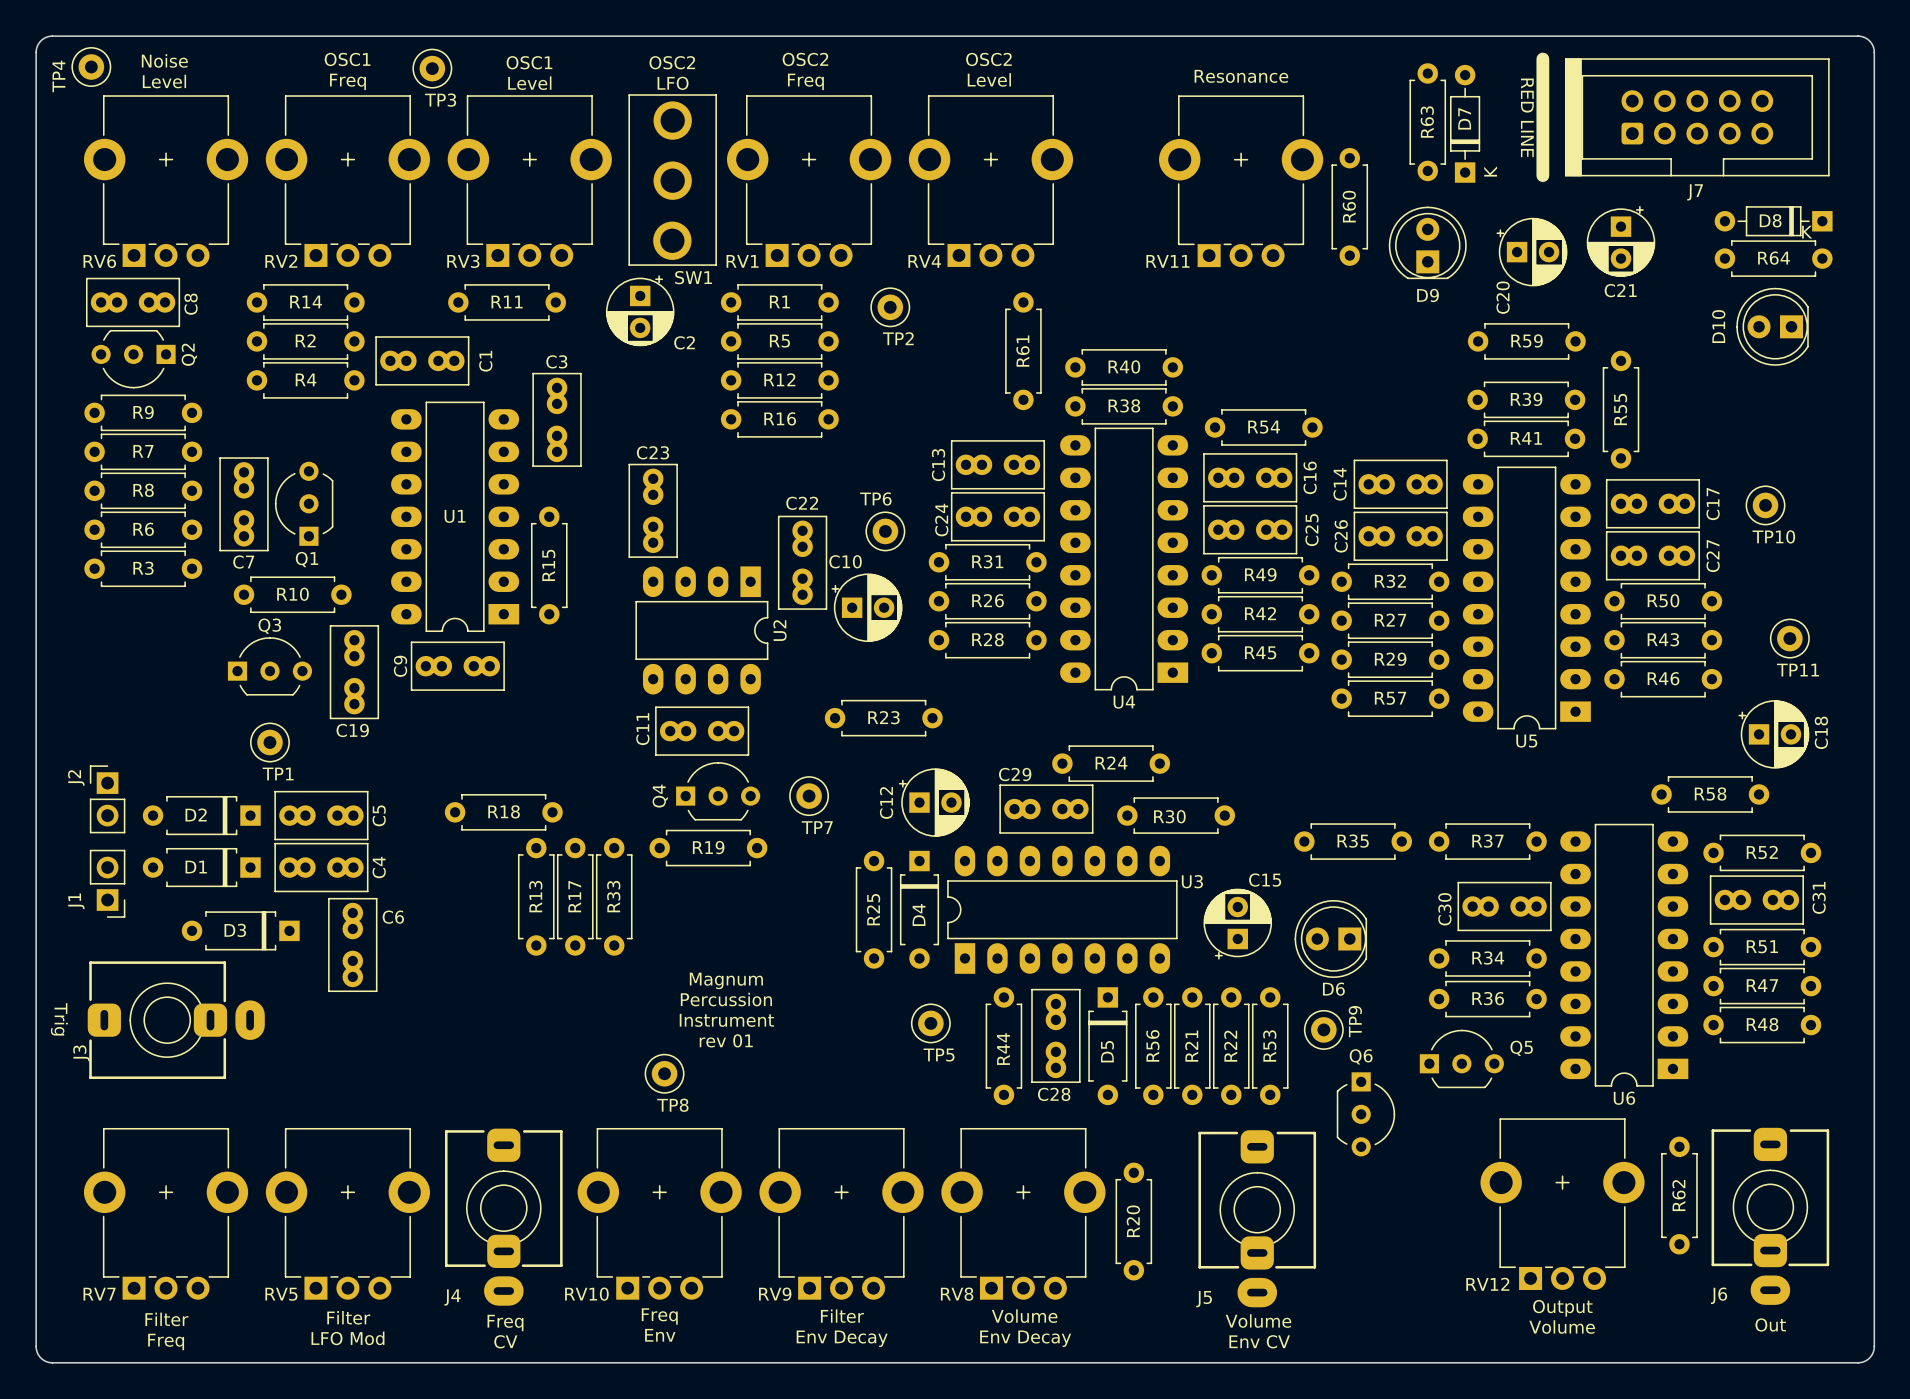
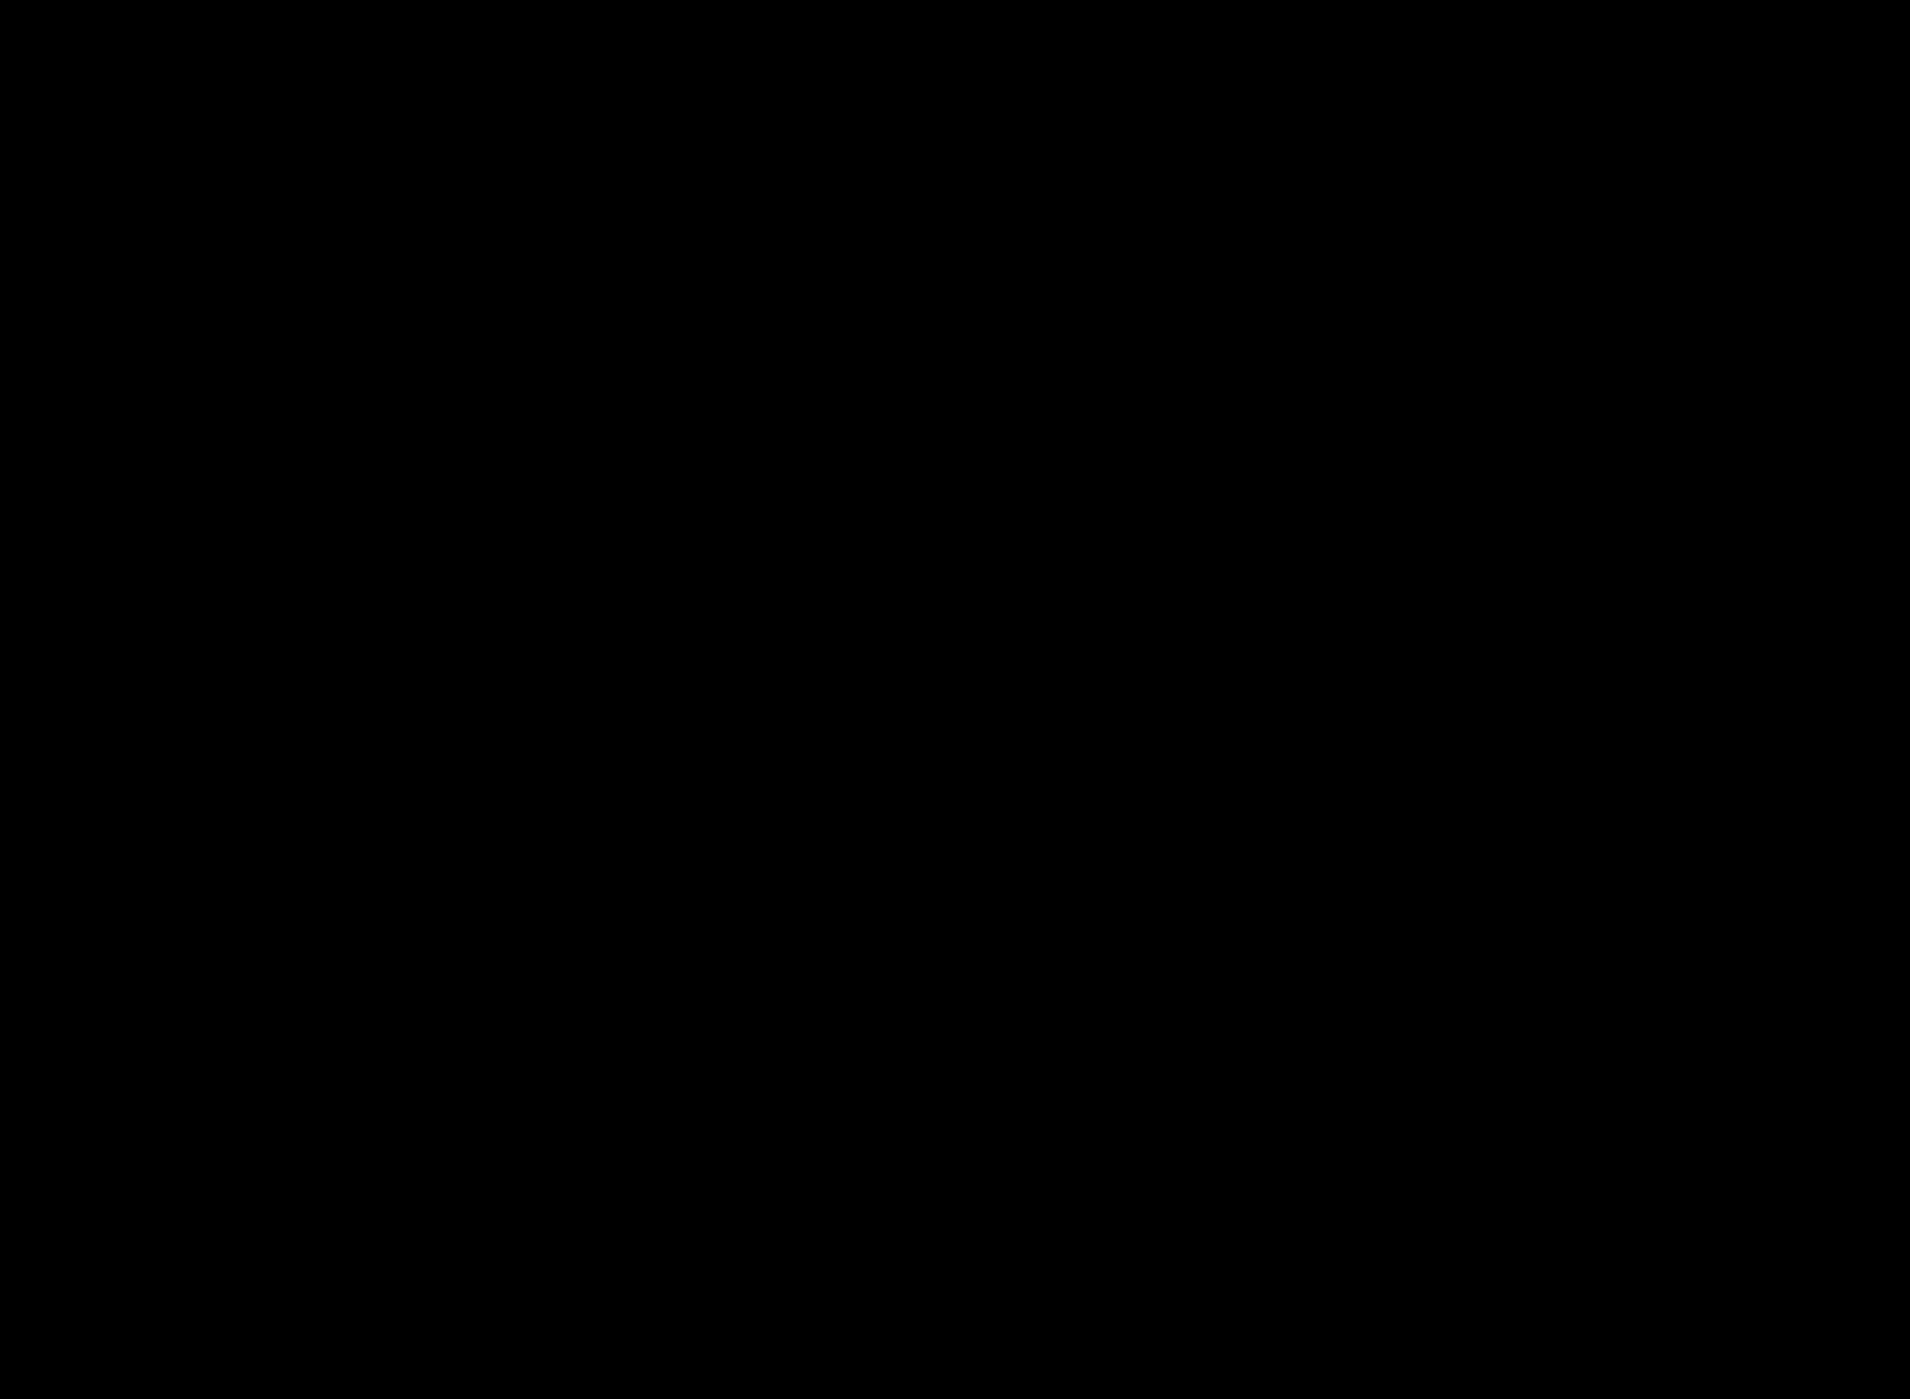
board edge: (52, 36) (1858, 36) (1868, 39) (1872, 45) (1874, 52) (1874, 1346) (1870, 1356) (1865, 1361) (1858, 1362) (52, 1362) (42, 1359) (37, 1353) (36, 1346) (36, 52) (40, 40) (52, 36) -> none
text: OSC1 (347, 59) -> none
text: OSC2 (805, 59) -> none
text: OSC2 (988, 59) -> none
text: Noise (164, 60) -> none
text: OSC1 (529, 62) -> none
text: OSC2 (672, 62) -> none
TP4: (91, 66) -> none
TP3: (432, 68) -> none
text: Resonance (1241, 76) -> none
text: Level (989, 79) -> none
text: Level (164, 81) -> none
text: Freq (347, 81) -> none
text: Freq (805, 81) -> none
text: Level (529, 83) -> none
text: LFO (673, 83) -> none
J7: (1683, 117) -> none
R63: (1427, 122) -> none
D7: (1465, 123) -> none
SW1: (672, 180) -> none
RV6: (166, 181) -> none
RV2: (347, 181) -> none
RV3: (529, 181) -> none
RV1: (809, 181) -> none
RV4: (990, 181) -> none
RV11: (1241, 181) -> none
R60: (1349, 206) -> none
D8: (1773, 221) -> none
C21: (1620, 241) -> none
D9: (1427, 242) -> none
C20: (1531, 252) -> none
R64: (1773, 258) -> none
C8: (133, 302) -> none
R14: (305, 302) -> none
R11: (507, 302) -> none
R1: (779, 302) -> none
TP2: (890, 307) -> none
C2: (640, 310) -> none
D10: (1772, 326) -> none
R2: (305, 341) -> none
R5: (779, 341) -> none
R59: (1526, 341) -> none
R61: (1023, 351) -> none
Q2: (133, 359) -> none
C1: (422, 360) -> none
R40: (1124, 367) -> none
R4: (305, 380) -> none
R12: (779, 380) -> none
R39: (1526, 399) -> none
R38: (1124, 406) -> none
R55: (1620, 409) -> none
R9: (143, 412) -> none
C3: (557, 419) -> none
R16: (779, 419) -> none
R54: (1263, 427) -> none
R41: (1526, 438) -> none
R7: (143, 451) -> none
C13: (997, 464) -> none
C16: (1250, 477) -> none
C14: (1400, 484) -> none
R8: (143, 490) -> none
Q1: (304, 503) -> none
C17: (1652, 503) -> none
C7: (243, 504) -> none
TP10: (1765, 505) -> none
C23: (653, 510) -> none
U1: (455, 516) -> none
C24: (997, 516) -> none
R6: (143, 529) -> none
C25: (1250, 529) -> none
TP6: (885, 531) -> none
C26: (1400, 536) -> none
C27: (1652, 555) -> none
U4: (1124, 559) -> none
C22: (802, 562) -> none
R31: (987, 562) -> none
R15: (549, 565) -> none
R3: (143, 568) -> none
R49: (1260, 575) -> none
R32: (1390, 581) -> none
R10: (292, 594) -> none
U5: (1526, 597) -> none
R26: (987, 601) -> none
R50: (1663, 601) -> none
C10: (866, 607) -> none
R42: (1260, 614) -> none
R27: (1390, 620) -> none
U2: (701, 630) -> none
TP11: (1789, 638) -> none
R28: (987, 640) -> none
R43: (1663, 640) -> none
R45: (1260, 653) -> none
R29: (1390, 659) -> none
Q3: (269, 666) -> none
C9: (457, 666) -> none
C19: (354, 672) -> none
R46: (1663, 679) -> none
R57: (1390, 698) -> none
R23: (883, 718) -> none
C11: (702, 731) -> none
C18: (1773, 734) -> none
TP1: (269, 742) -> none
R24: (1111, 763) -> none
Q4: (718, 791) -> none
R58: (1710, 794) -> none
TP7: (809, 796) -> none
J2: (107, 799) -> none
C12: (934, 802) -> none
C29: (1046, 809) -> none
R18: (503, 812) -> none
D2: (201, 815) -> none
C5: (321, 815) -> none
R30: (1176, 815) -> none
R35: (1353, 841) -> none
R37: (1487, 841) -> none
R19: (708, 848) -> none
R52: (1762, 852) -> none
D1: (201, 867) -> none
C4: (321, 867) -> none
J1: (107, 883) -> none
R13: (536, 896) -> none
R17: (575, 896) -> none
R33: (614, 896) -> none
C31: (1756, 900) -> none
C30: (1504, 906) -> none
R25: (874, 909) -> none
D4: (919, 909) -> none
U3: (1062, 909) -> none
C15: (1237, 924) -> none
D3: (240, 930) -> none
D6: (1330, 938) -> none
C6: (352, 944) -> none
R51: (1762, 947) -> none
U6: (1624, 955) -> none
R34: (1487, 958) -> none
text: Magnum (726, 980) -> none
R47: (1762, 986) -> none
text: Percussion (726, 999) -> none
R36: (1487, 999) -> none
text: Trig (59, 1019) -> none
J3: (176, 1020) -> none
text: Instrument (726, 1020) -> none
TP5: (930, 1023) -> none
R48: (1762, 1025) -> none
TP9: (1323, 1029) -> none
C28: (1055, 1035) -> none
text: rev 01 (726, 1040) -> none
R44: (1003, 1046) -> none
D5: (1107, 1046) -> none
R56: (1153, 1046) -> none
R21: (1192, 1046) -> none
R22: (1231, 1046) -> none
R53: (1270, 1046) -> none
Q5: (1461, 1058) -> none
TP8: (664, 1073) -> none
Q6: (1365, 1114) -> none
R62: (1679, 1195) -> none
RV12: (1562, 1204) -> none
RV7: (166, 1213) -> none
RV5: (347, 1213) -> none
RV10: (659, 1213) -> none
RV9: (841, 1213) -> none
RV8: (1023, 1213) -> none
J6: (1770, 1216) -> none
J4: (503, 1217) -> none
J5: (1257, 1218) -> none
R20: (1133, 1221) -> none
text: Output (1562, 1308) -> none
text: Freq (659, 1316) -> none
text: Filter (842, 1316) -> none
text: Volume (1024, 1316) -> none
text: Filter (348, 1317) -> none
text: Filter (166, 1319) -> none
text: Volume (1258, 1321) -> none
text: Freq (505, 1323) -> none
text: Out (1770, 1324) -> none
text: Volume (1562, 1327) -> none
text: Env (660, 1335) -> none
text: LFO Mod (347, 1338) -> none
text: Env Decay (842, 1338) -> none
text: Env Decay (1025, 1338) -> none
text: Freq (166, 1341) -> none
text: CV (505, 1341) -> none
text: Env CV (1259, 1341) -> none

